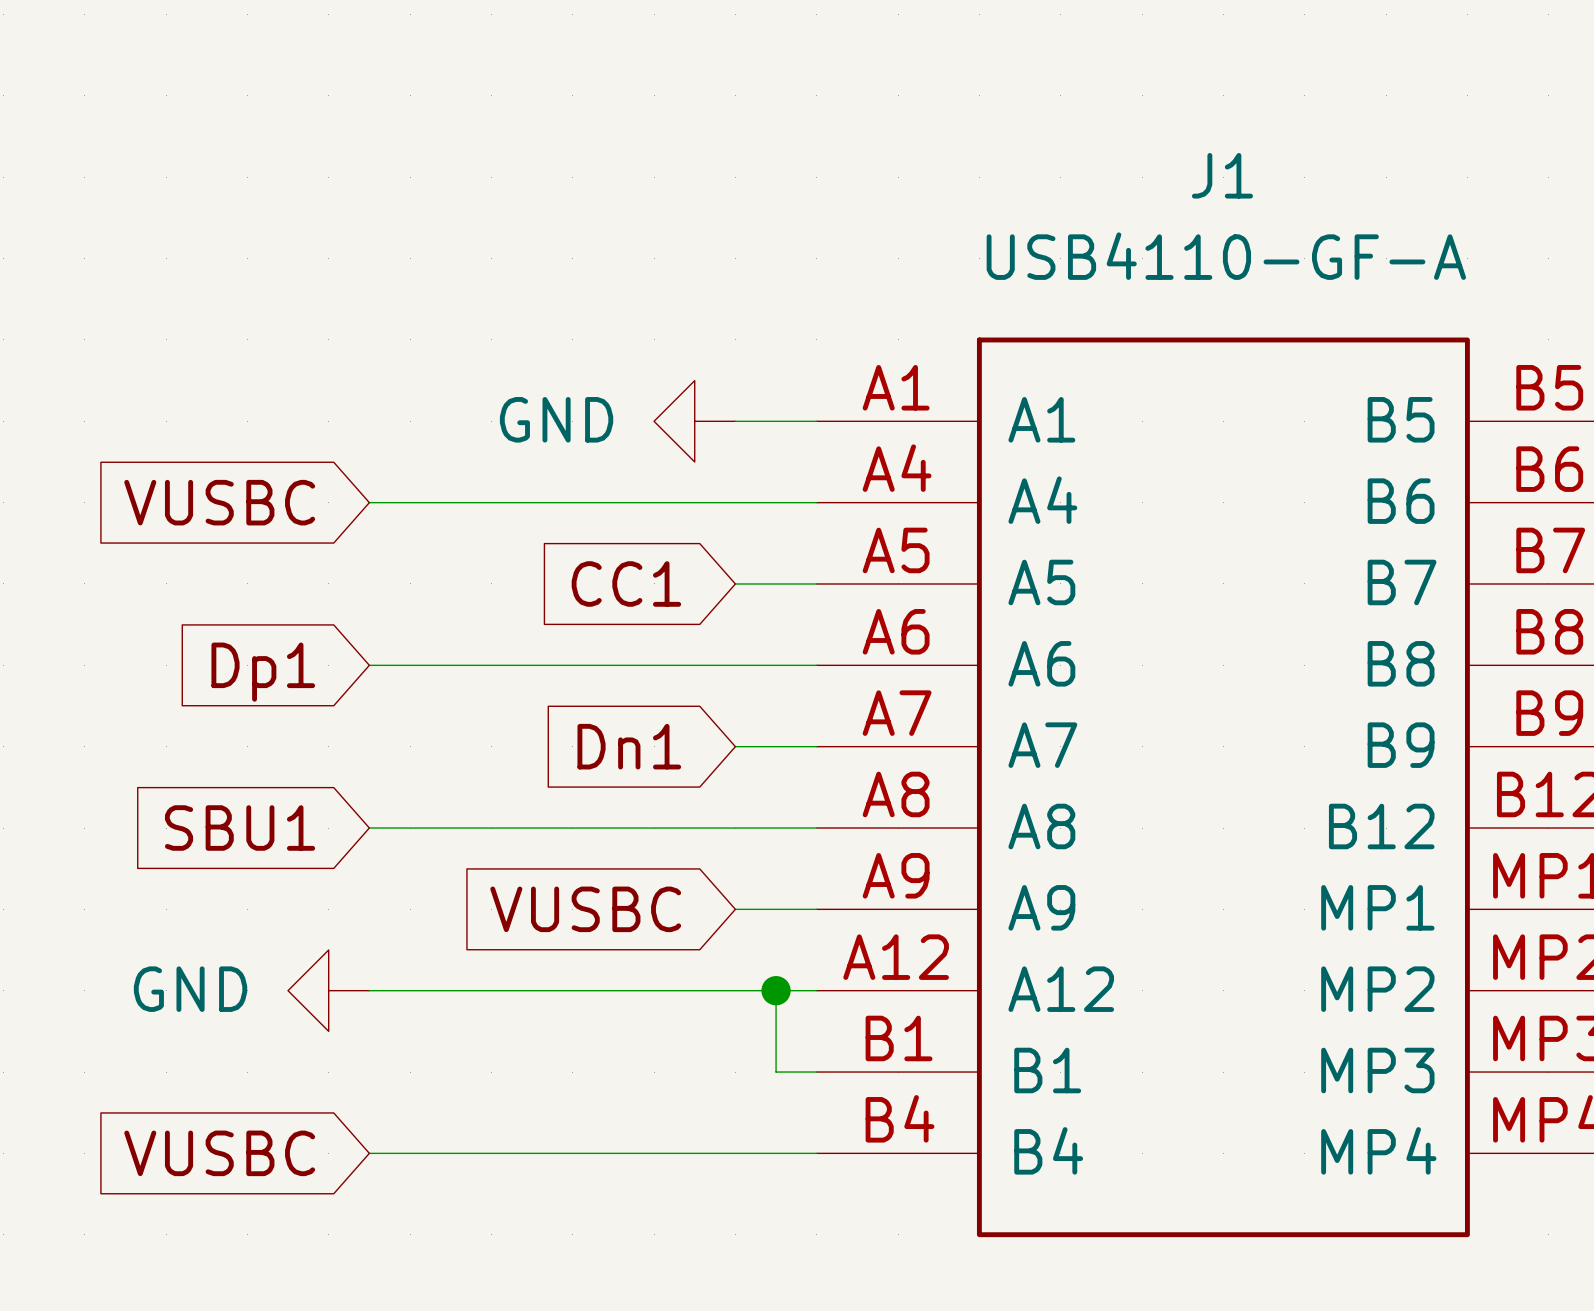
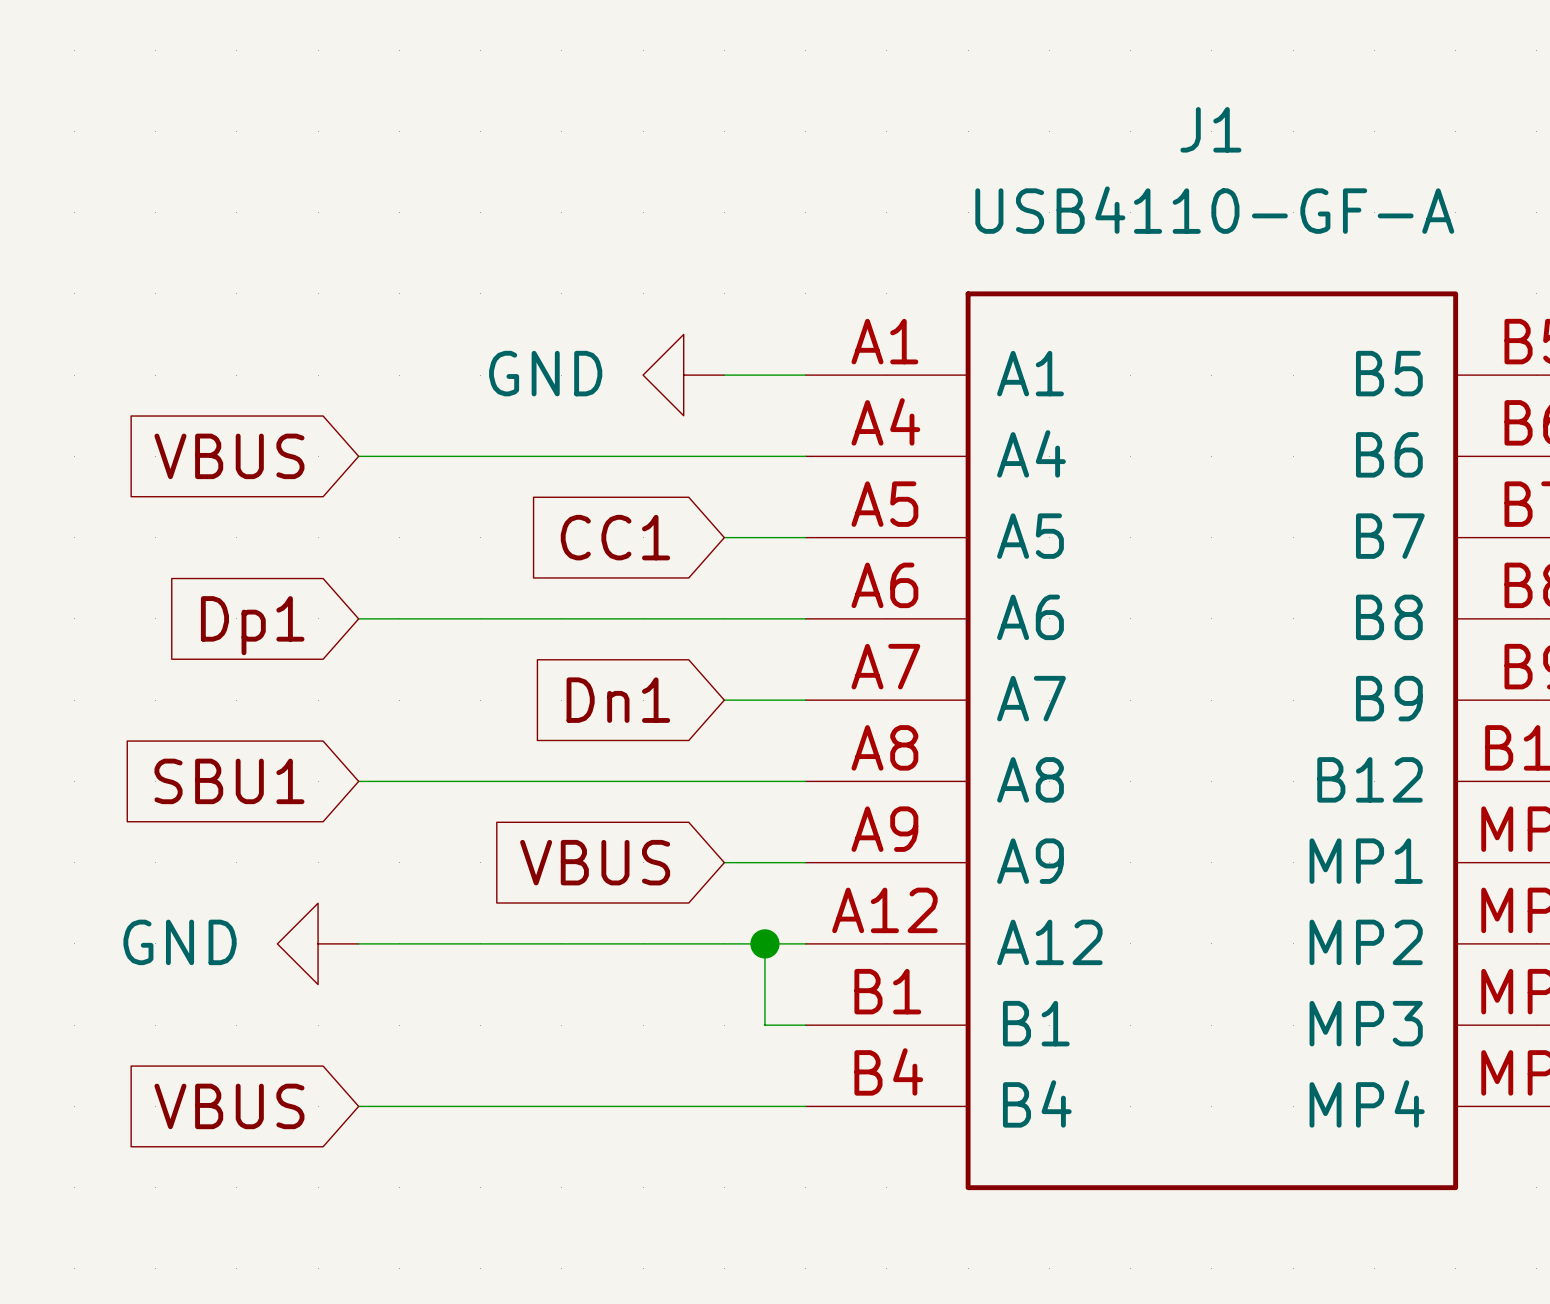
global label: VUSBC (219, 502) -> VBUS (229, 456)
global label: VUSBC (585, 909) -> VBUS (595, 862)
global label: VUSBC (219, 1153) -> VBUS (229, 1106)

